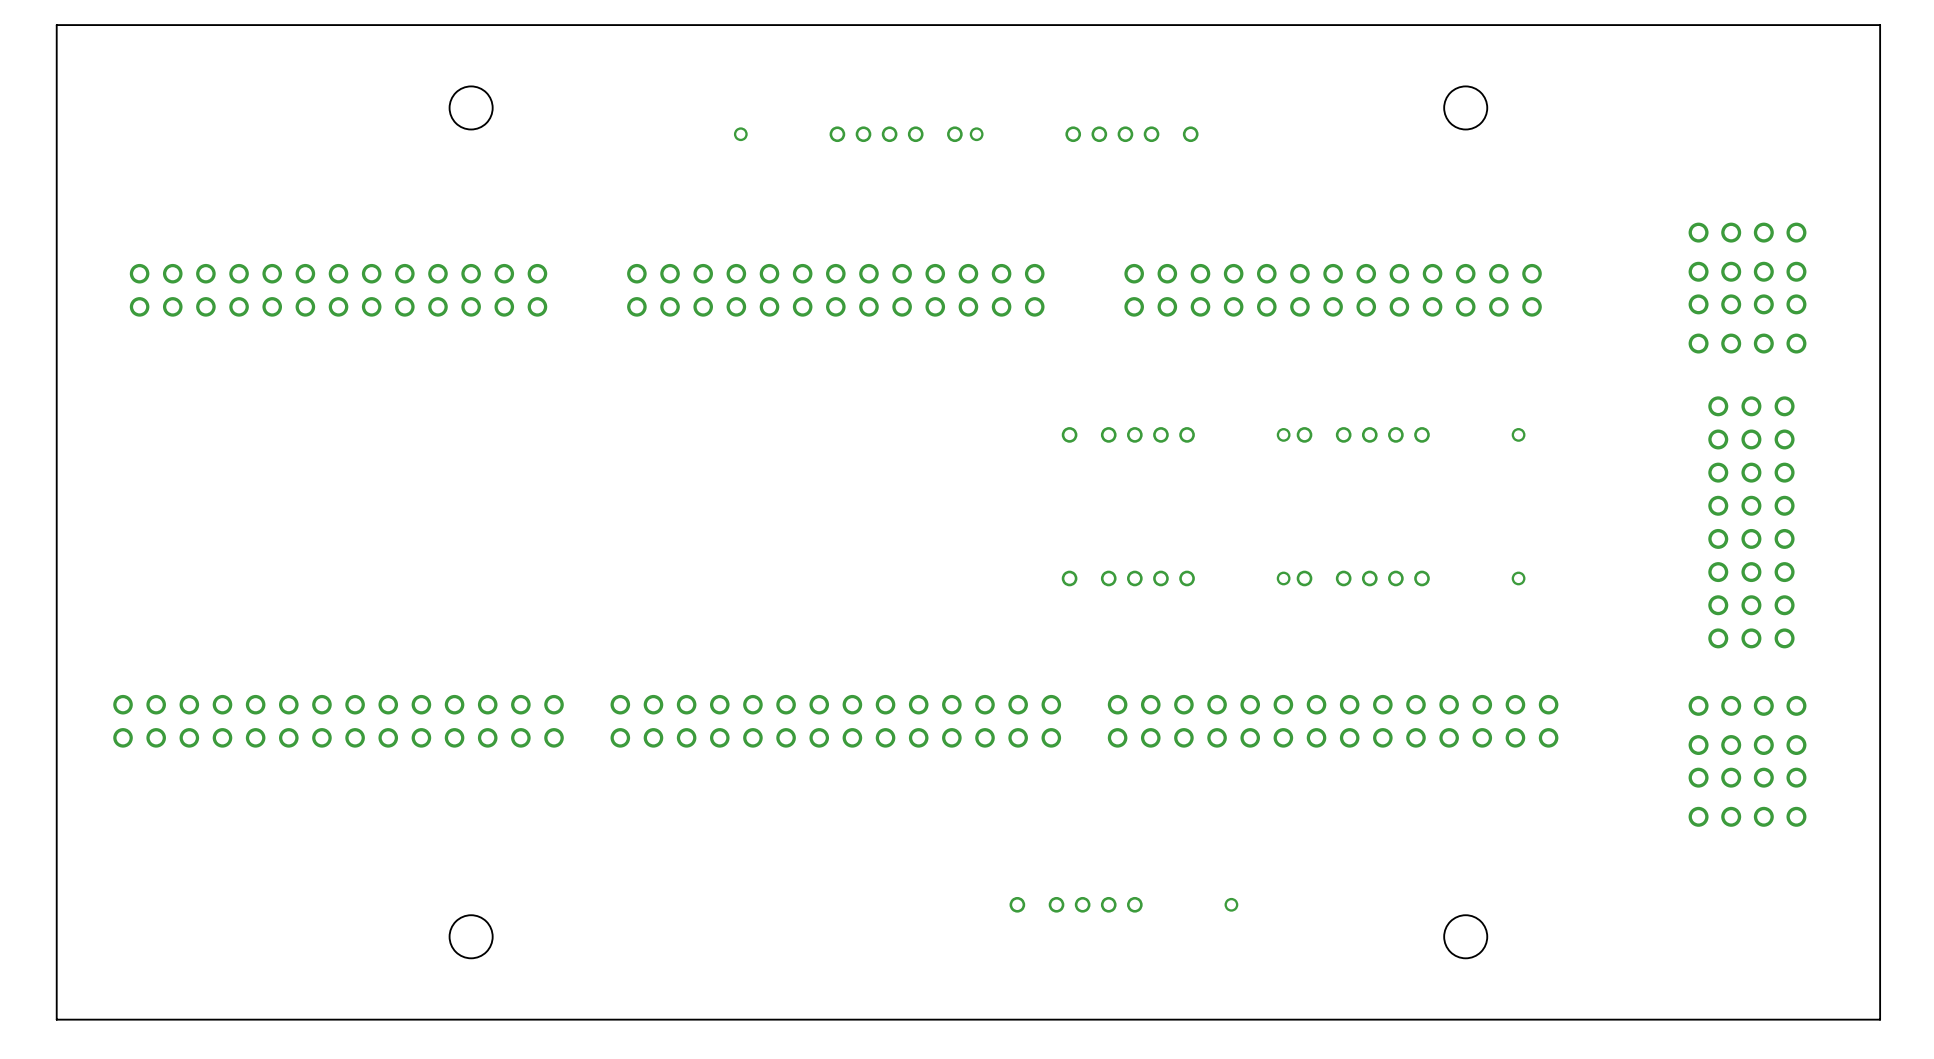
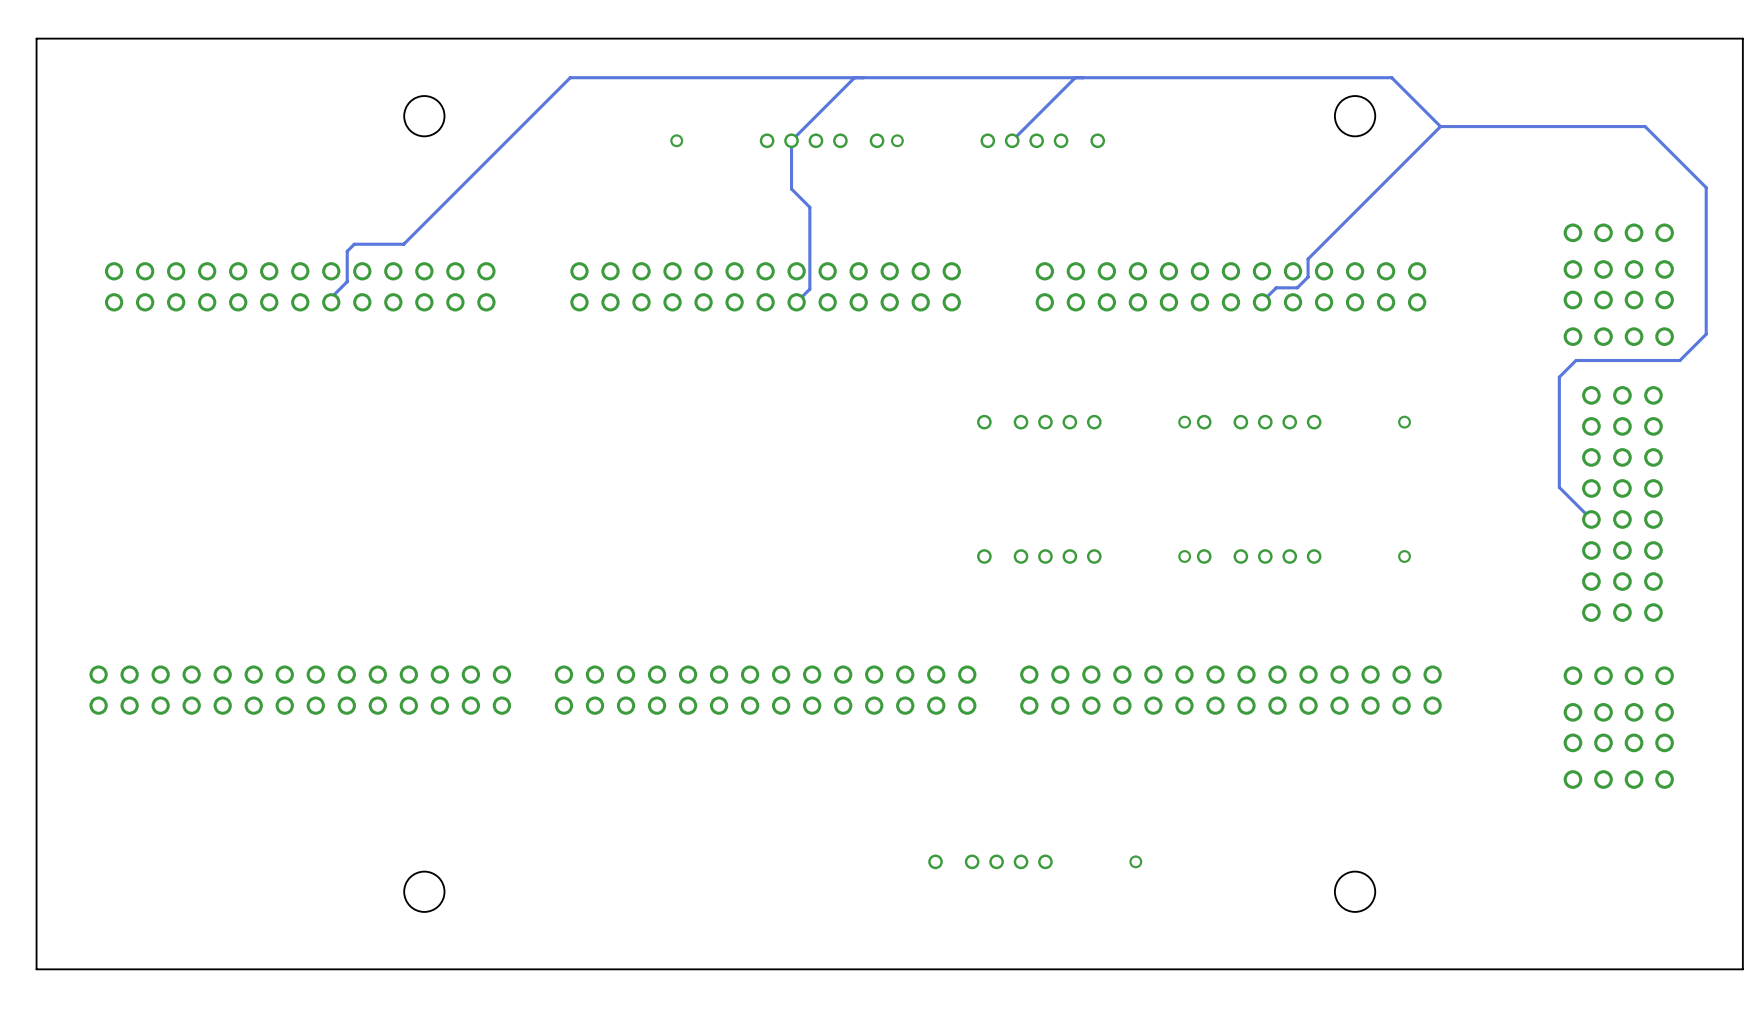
track: none -> (854, 77) (791, 140) (791, 189) (809, 207) (809, 289) (796, 302)
track: none -> (1075, 77) (1012, 140)
track: none -> (1440, 126) (1645, 126) (1706, 187) (1706, 334) (1679, 360) (1576, 360) (1559, 377) (1559, 487) (1591, 519)
track: none -> (1440, 126) (1308, 259) (1308, 277) (1297, 287) (1276, 287) (1261, 302)
track: none -> (1440, 126) (1391, 77) (570, 77) (403, 244) (354, 244) (347, 251) (347, 281) (331, 297) (331, 302)

